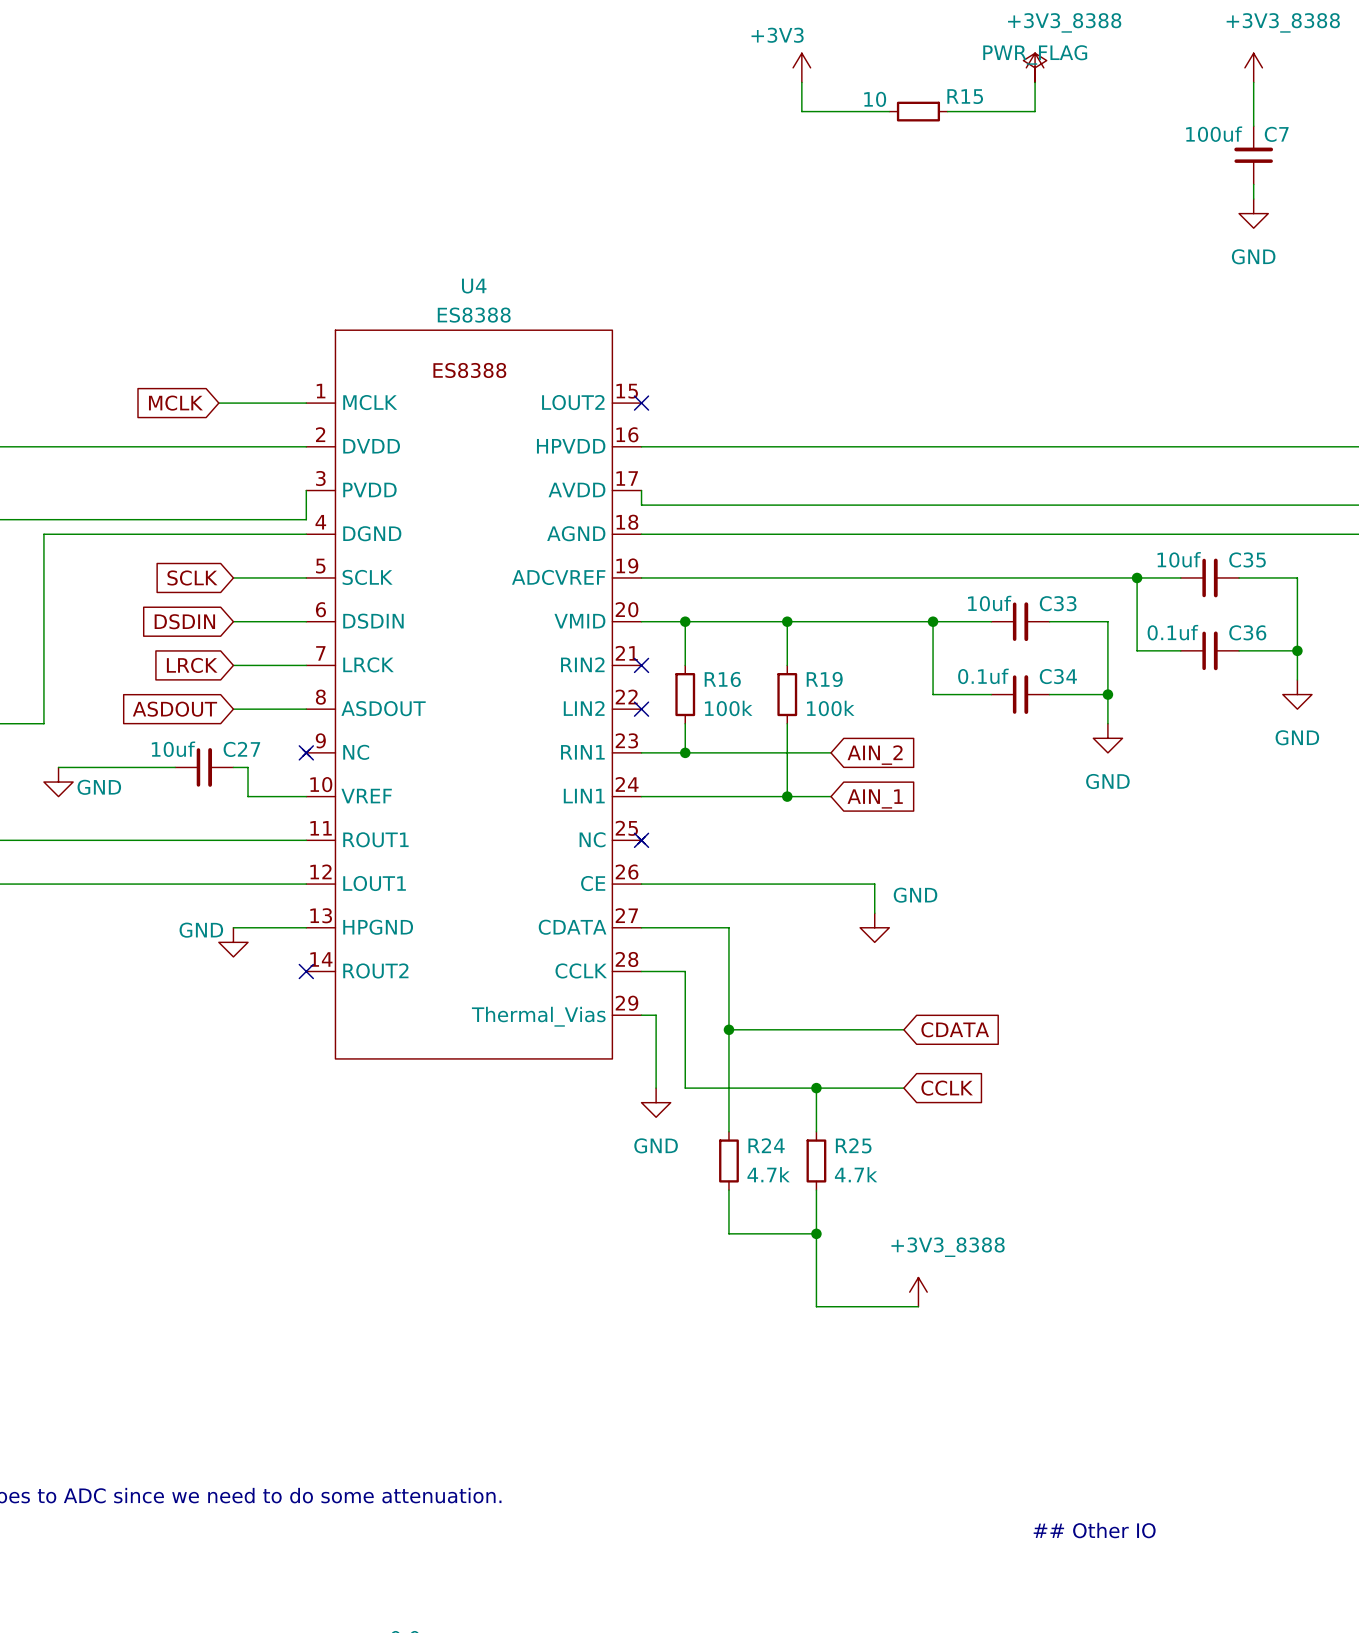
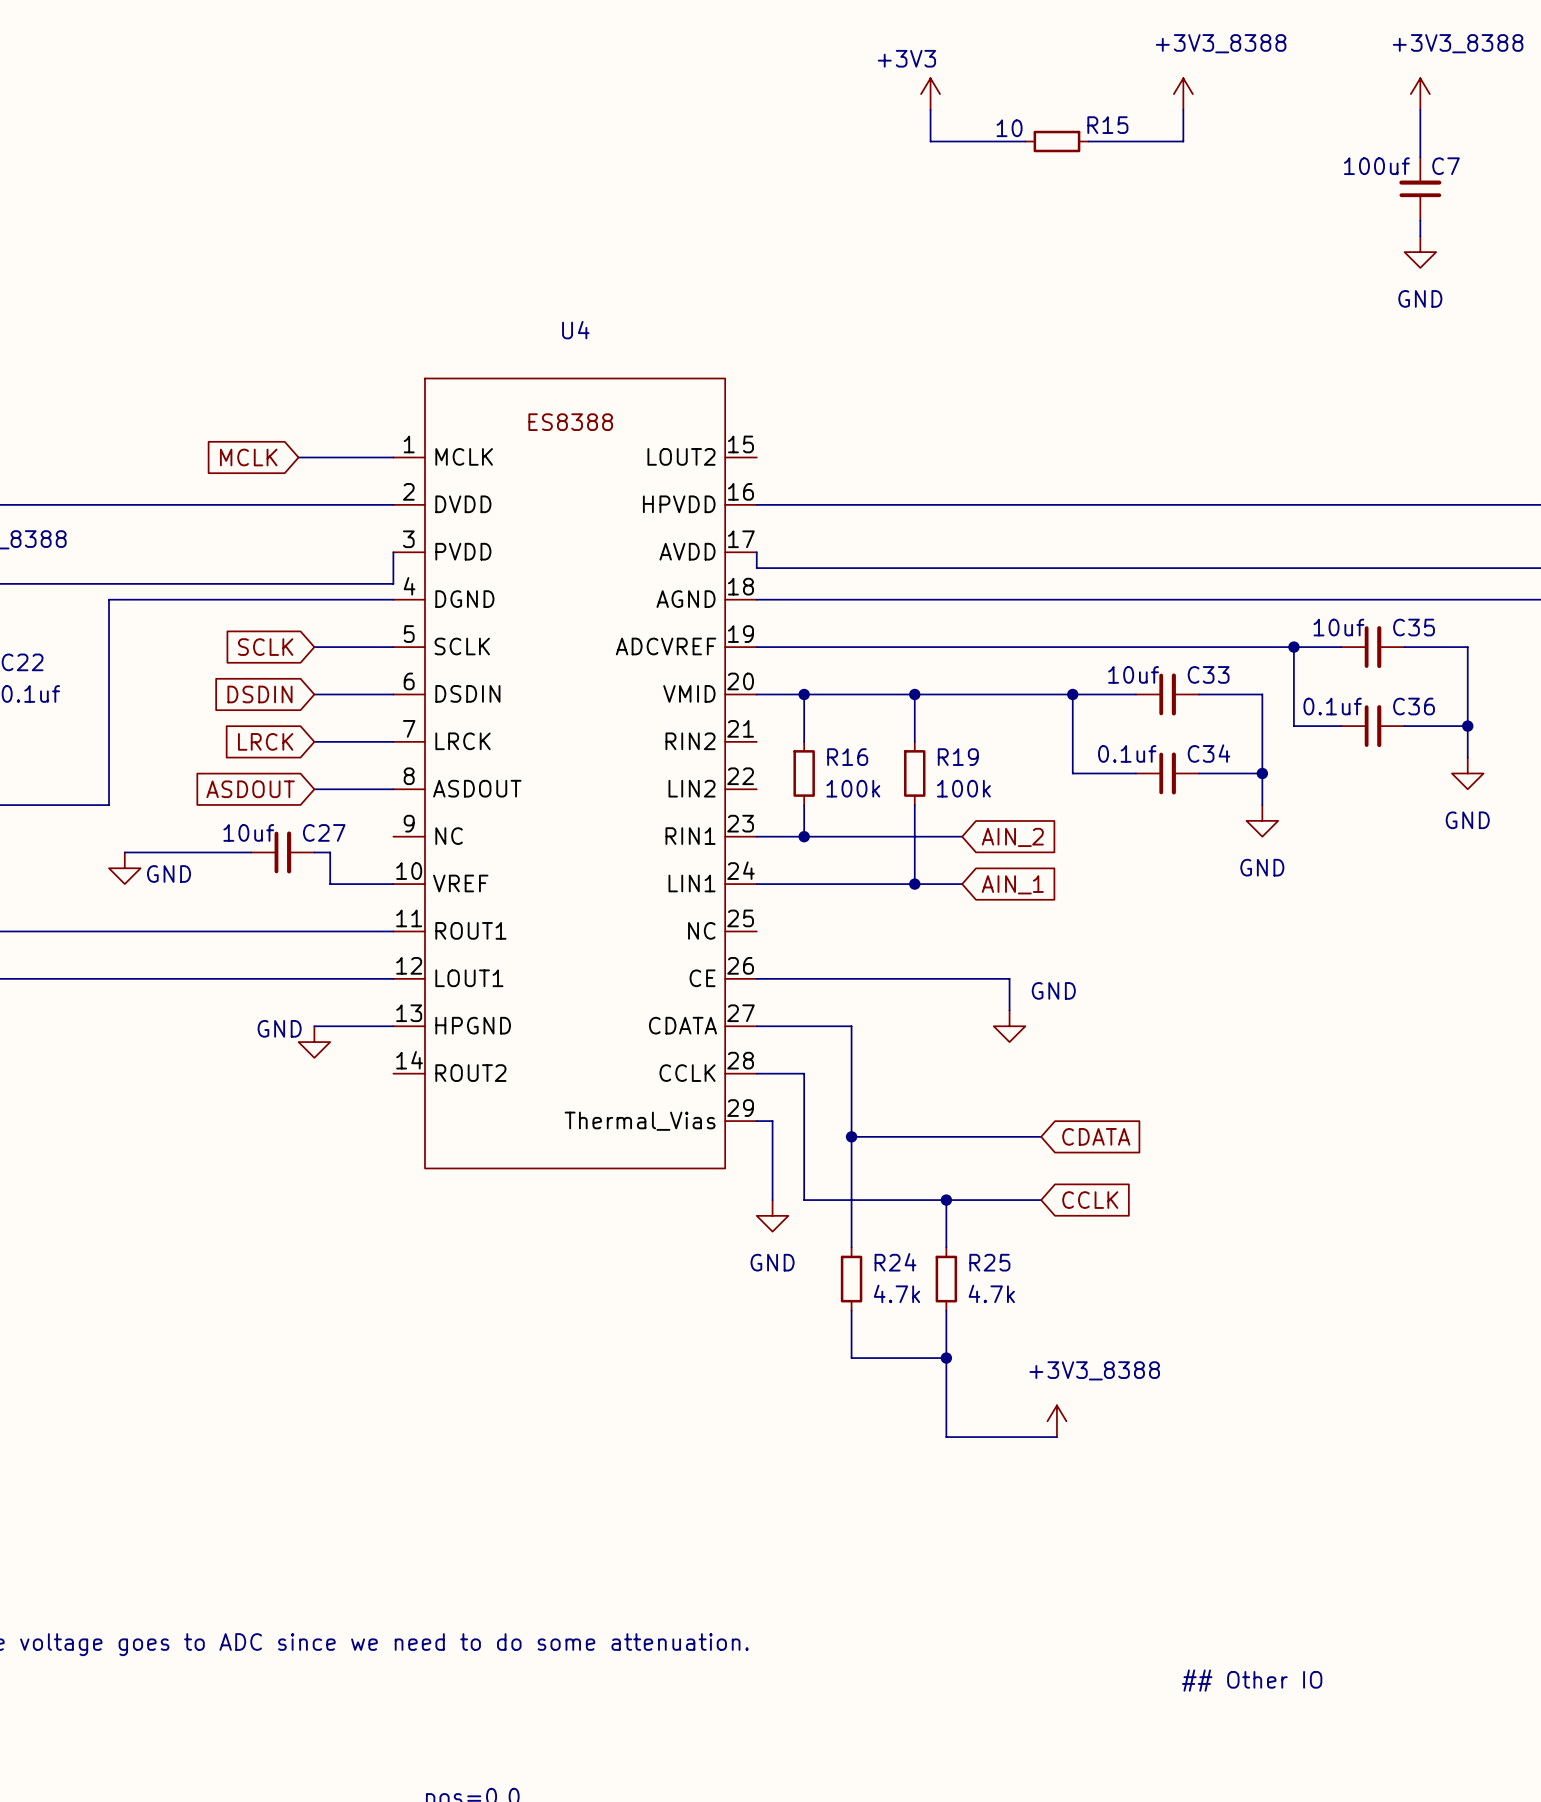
power symbol: PWR_FLAG (1035, 67) -> none
U4 value: ES8388 (474, 315) -> none
U4 symbol: [302, 330, 645, 1059] -> [393, 378, 757, 1169]
no-connect mark: (641, 403) -> none
no-connect mark: (641, 665) -> none
no-connect mark: (641, 709) -> none
no-connect mark: (306, 752) -> none
no-connect mark: (641, 840) -> none
no-connect mark: (306, 971) -> none

